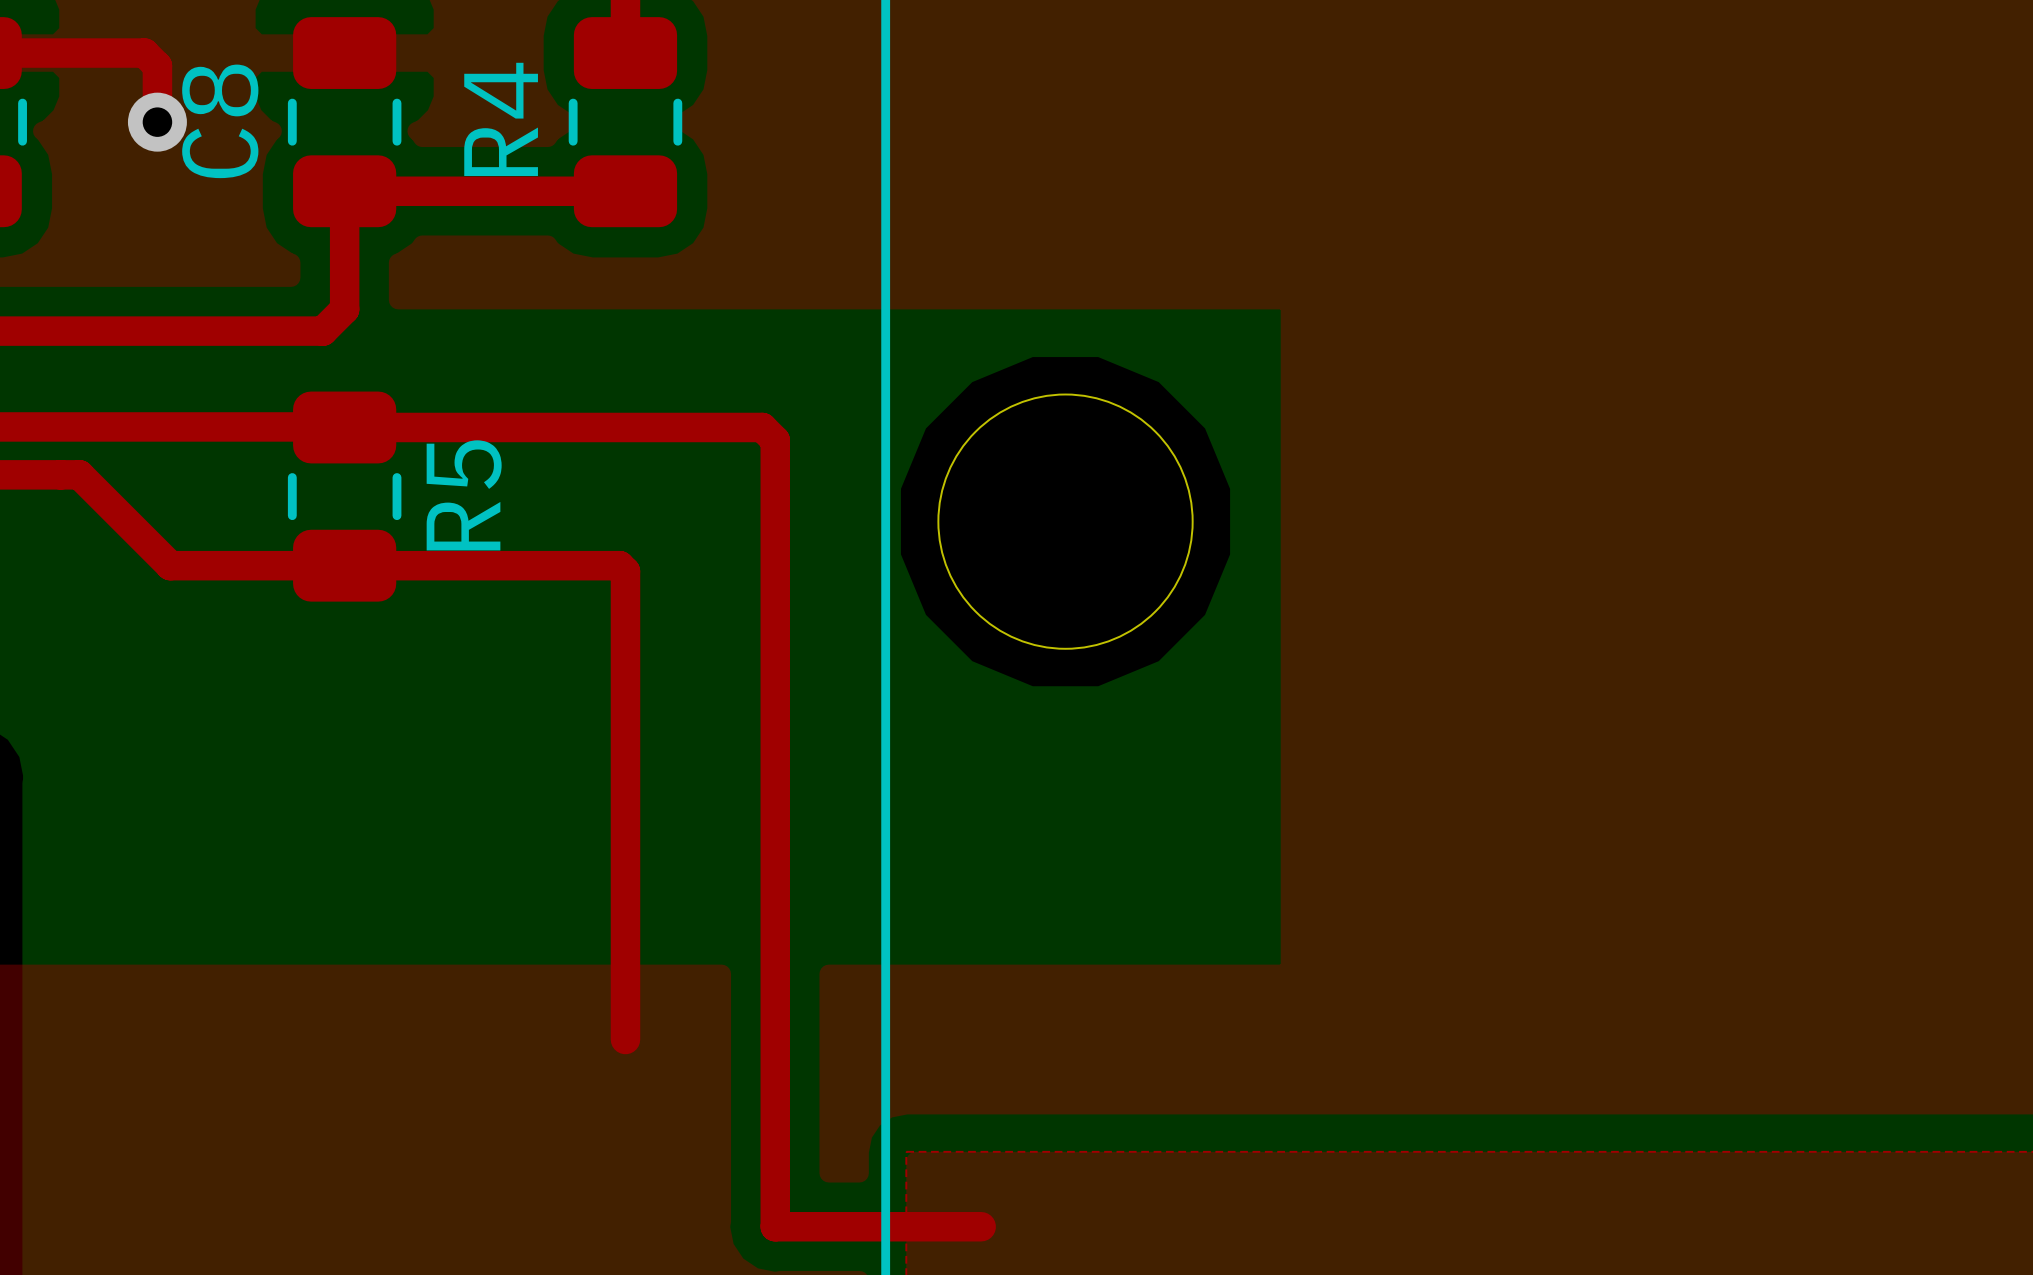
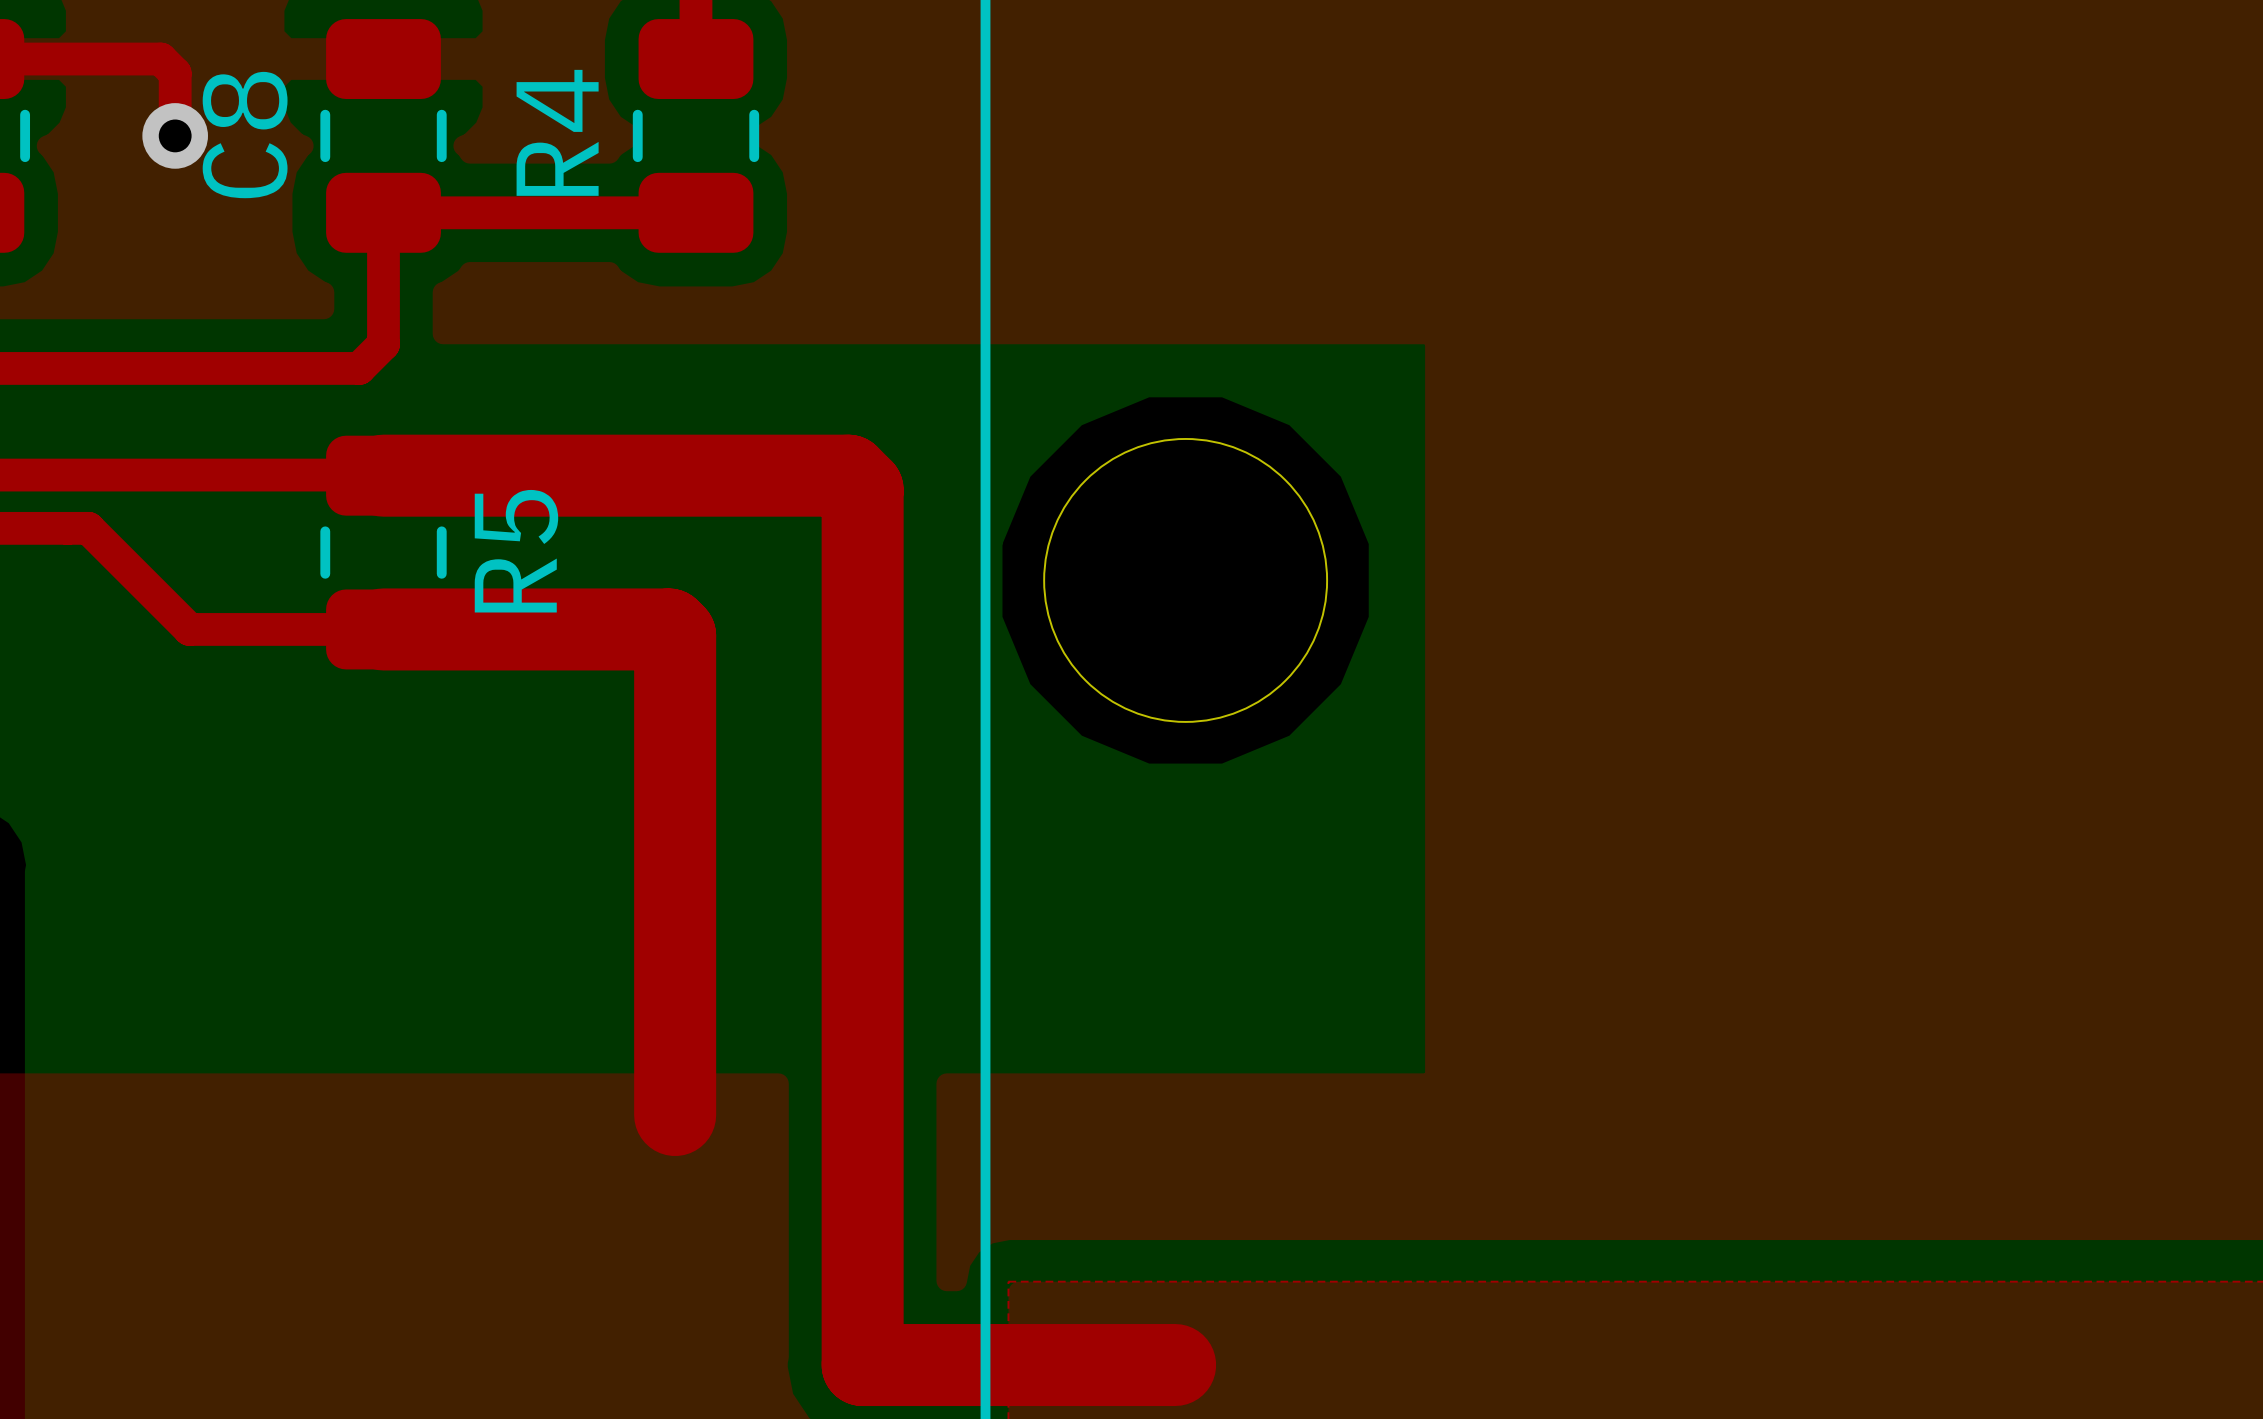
top track width: thin (344, 427) (762, 427) (775, 440) (775, 1226) (981, 1226) -> thick (383, 475) (848, 475) (862, 490) (862, 1365) (1091, 1365)
top track width: thin (344, 565) (600, 565) -> thick (383, 629) (668, 629)
top track: (600, 565) (619, 565) (625, 571) (625, 1039) -> (668, 629) (675, 635) (675, 1115)
top track: none -> (1091, 1365) (1175, 1365)

